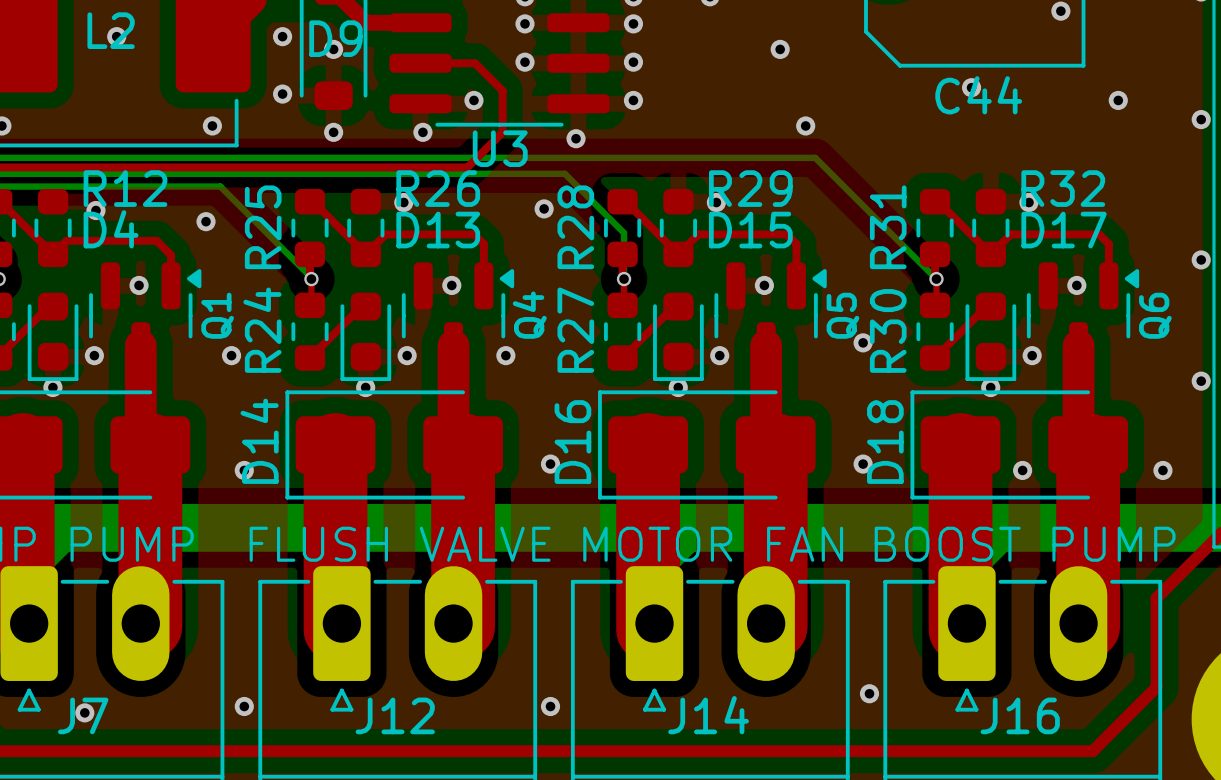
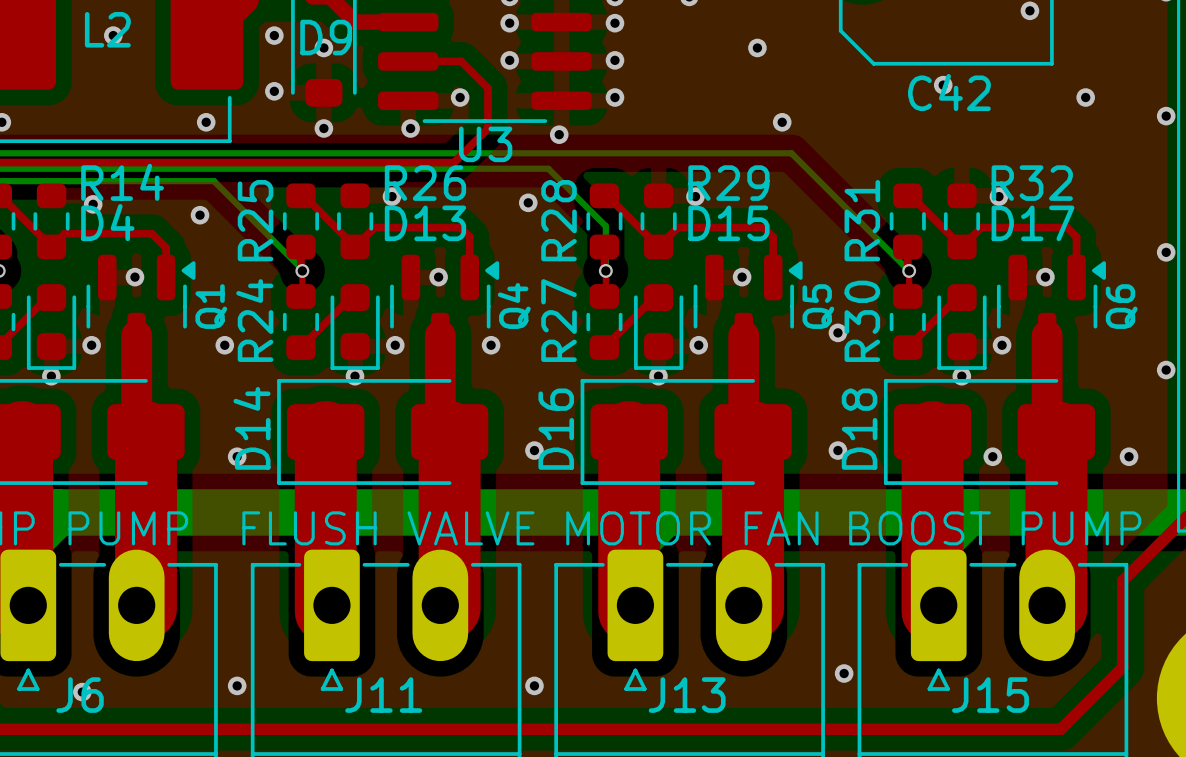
C44 name: C44 (978, 95) -> C42 (949, 92)
R12 name: R12 (125, 188) -> R14 (122, 182)
J7 name: J7 (83, 715) -> J6 (80, 695)
J12 name: J12 (395, 715) -> J11 (383, 695)
J14 name: J14 (708, 715) -> J13 (687, 695)
J16 name: J16 (1020, 715) -> J15 (990, 695)

